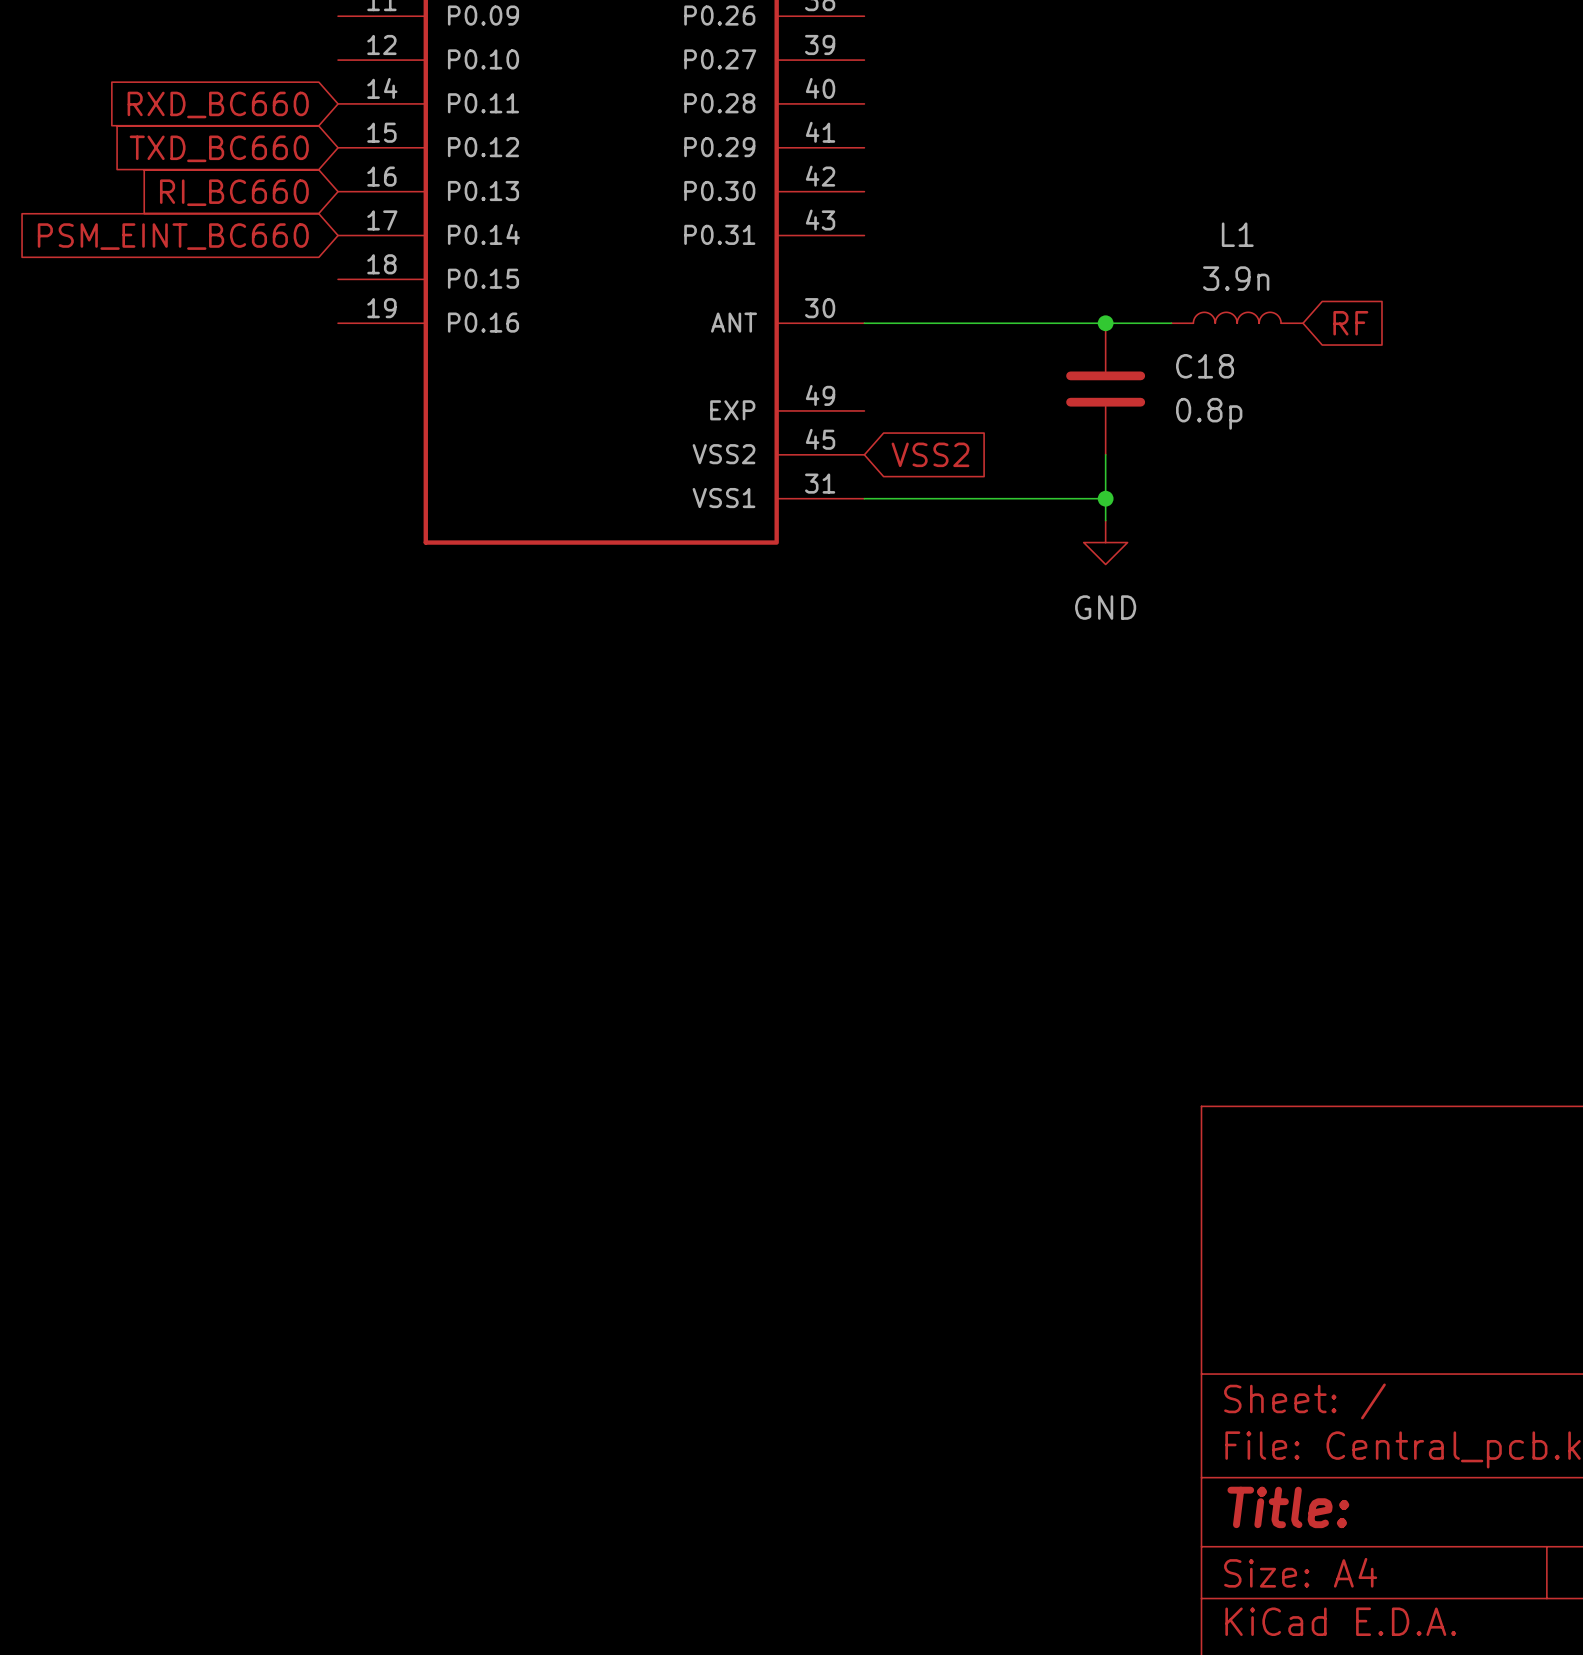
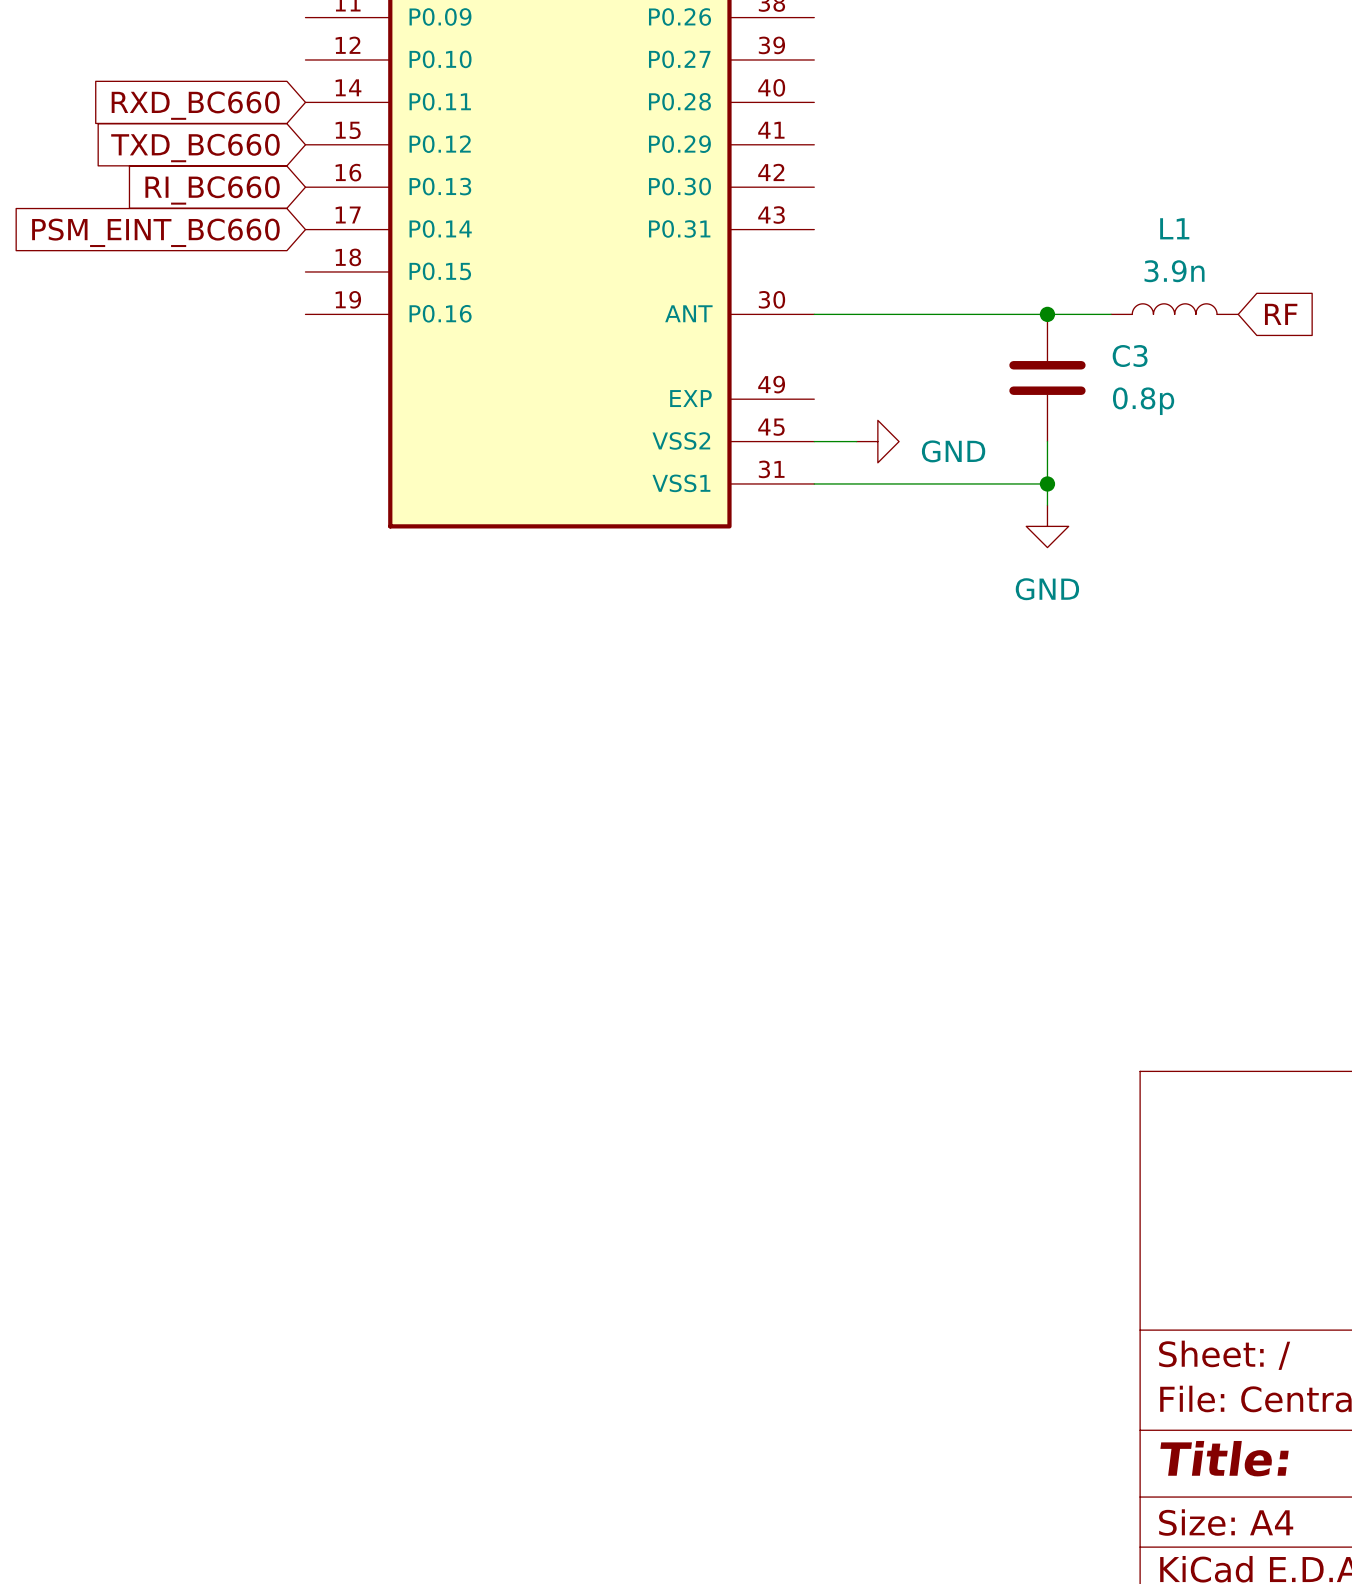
C18 name: C18 (1205, 366) -> C3 (1130, 356)
wire: none -> (814, 441) (856, 441)
global label: VSS2 (930, 454) -> none
power symbol: none -> GND (877, 441)

